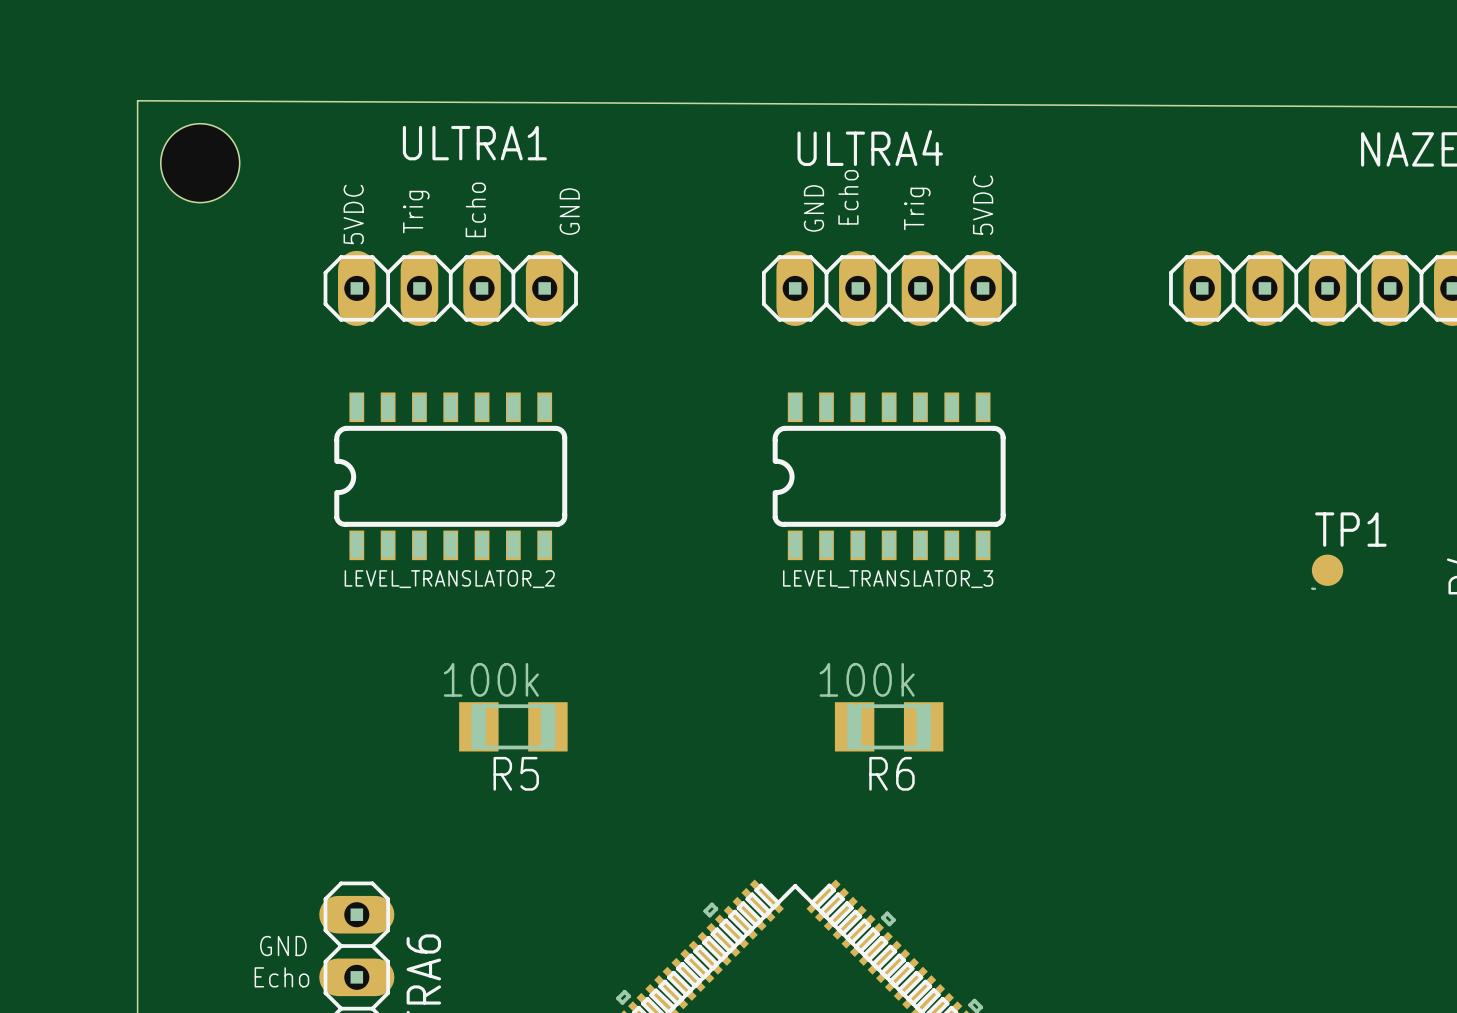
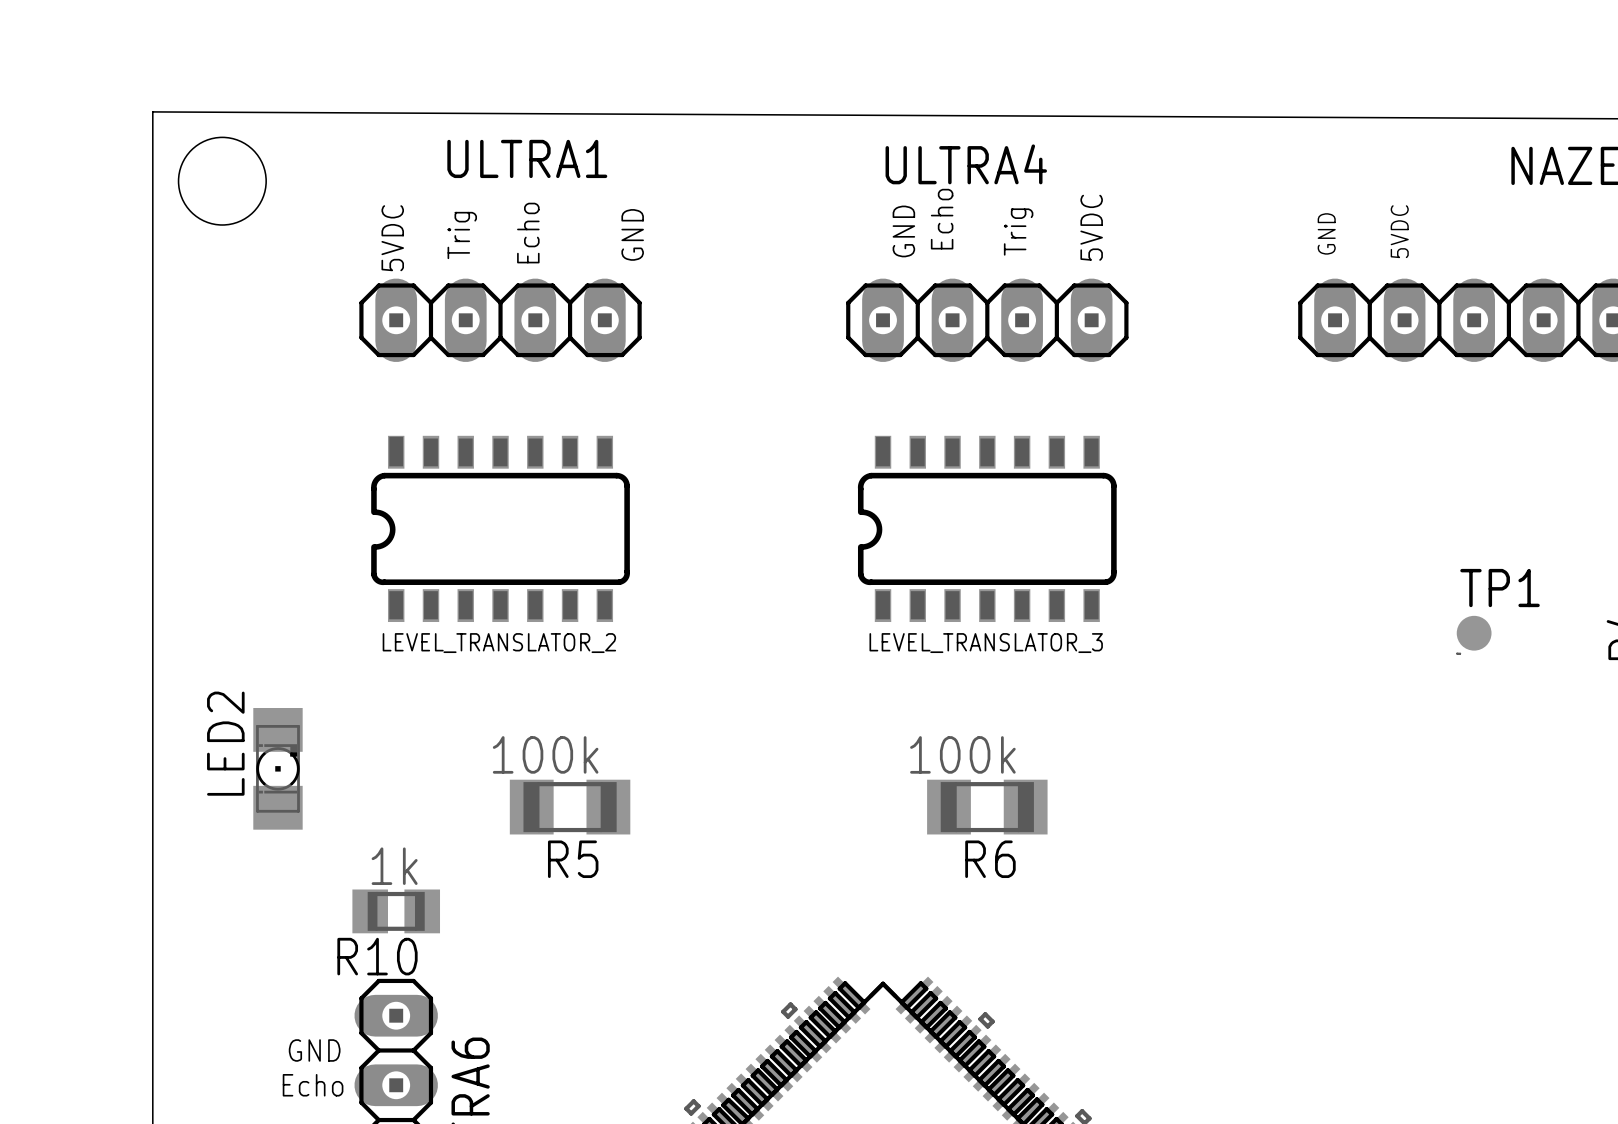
text: none -> 5VDC (1399, 231)
text: none -> GND (1326, 233)
LED2: none -> (277, 768)
R10: none -> 1k (396, 911)

